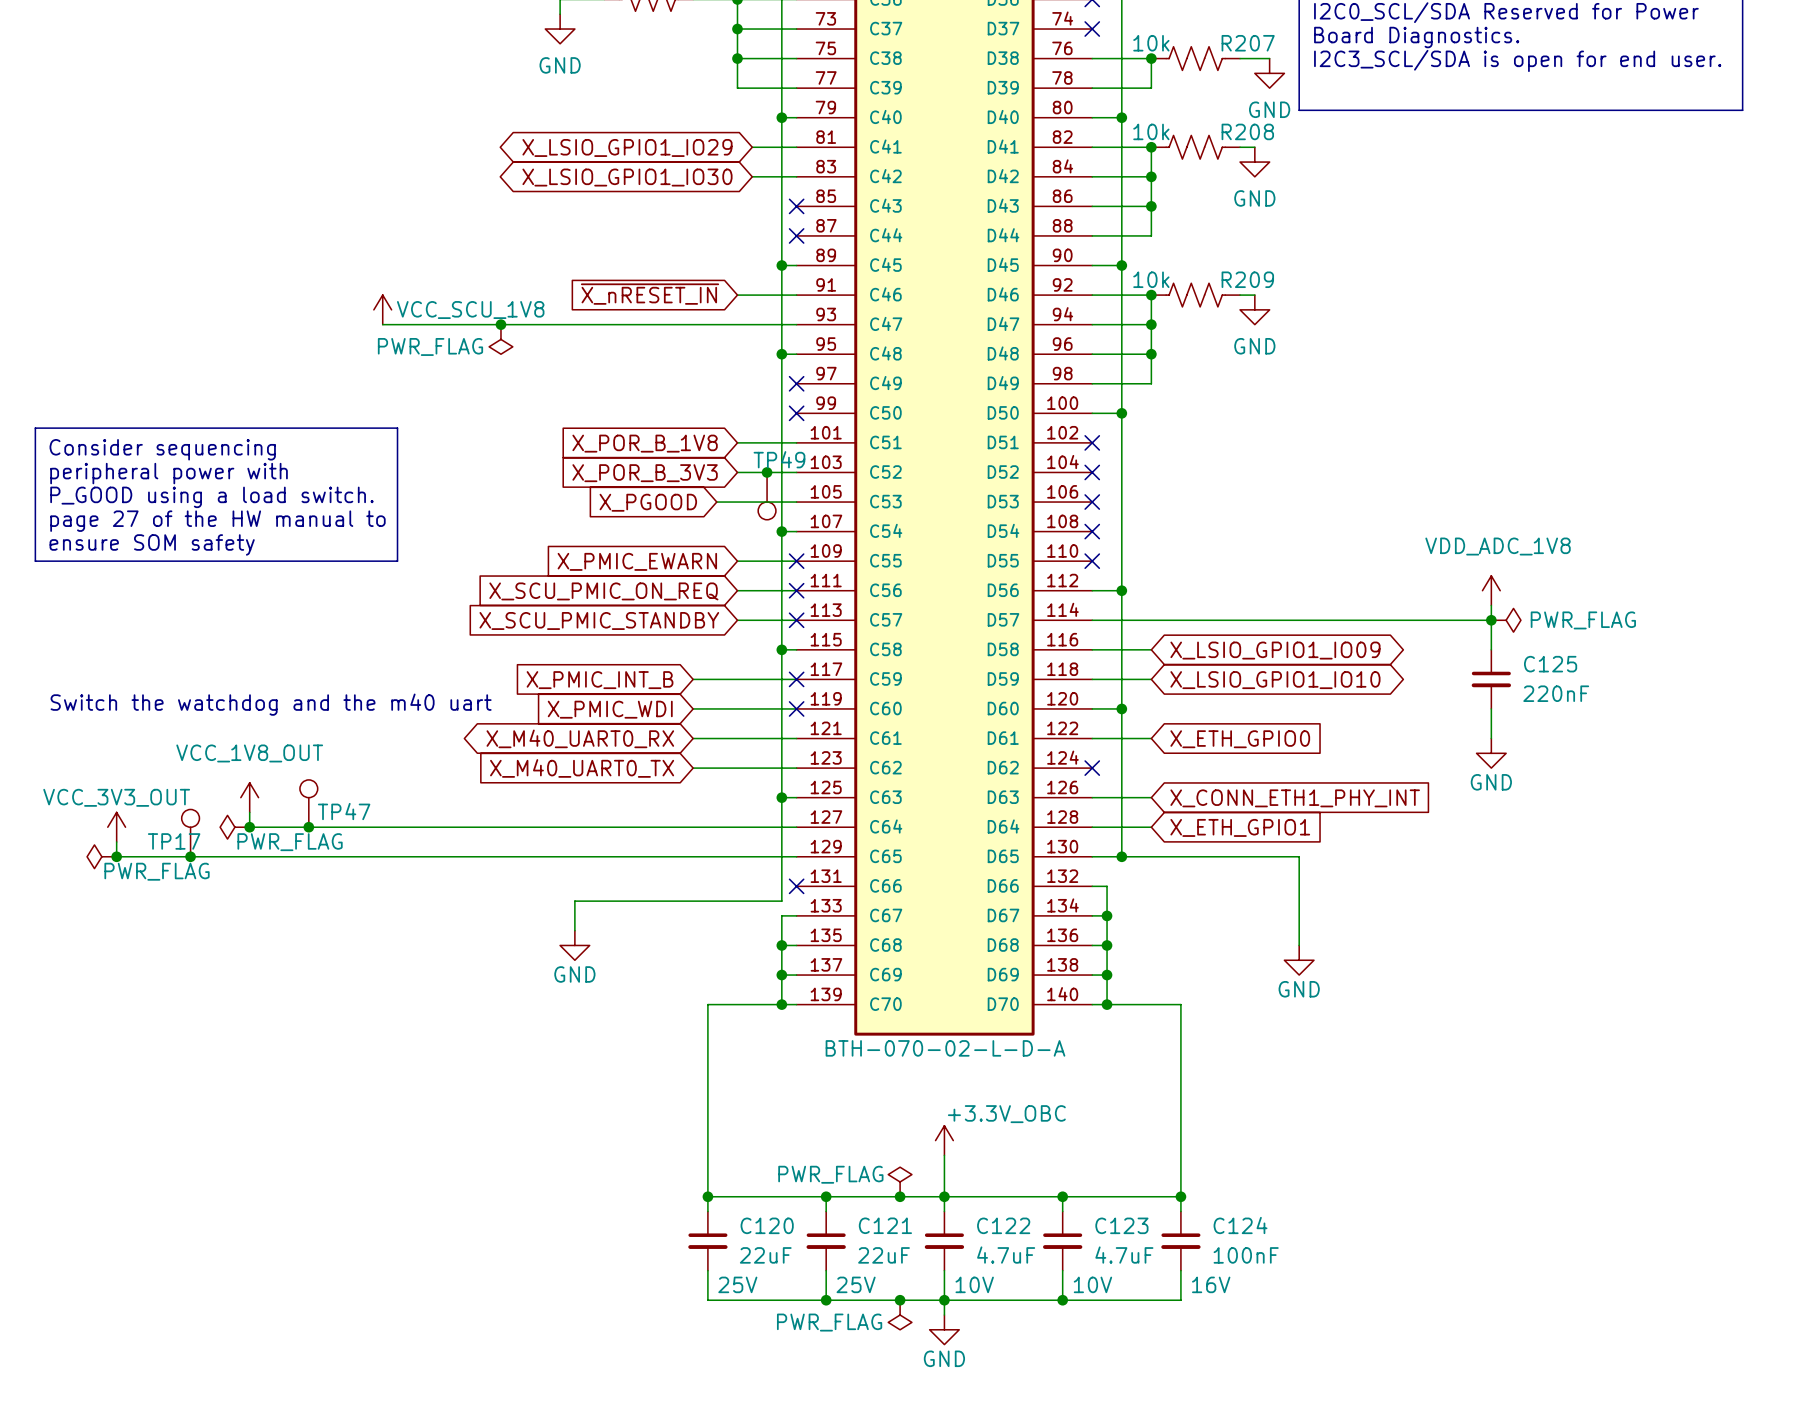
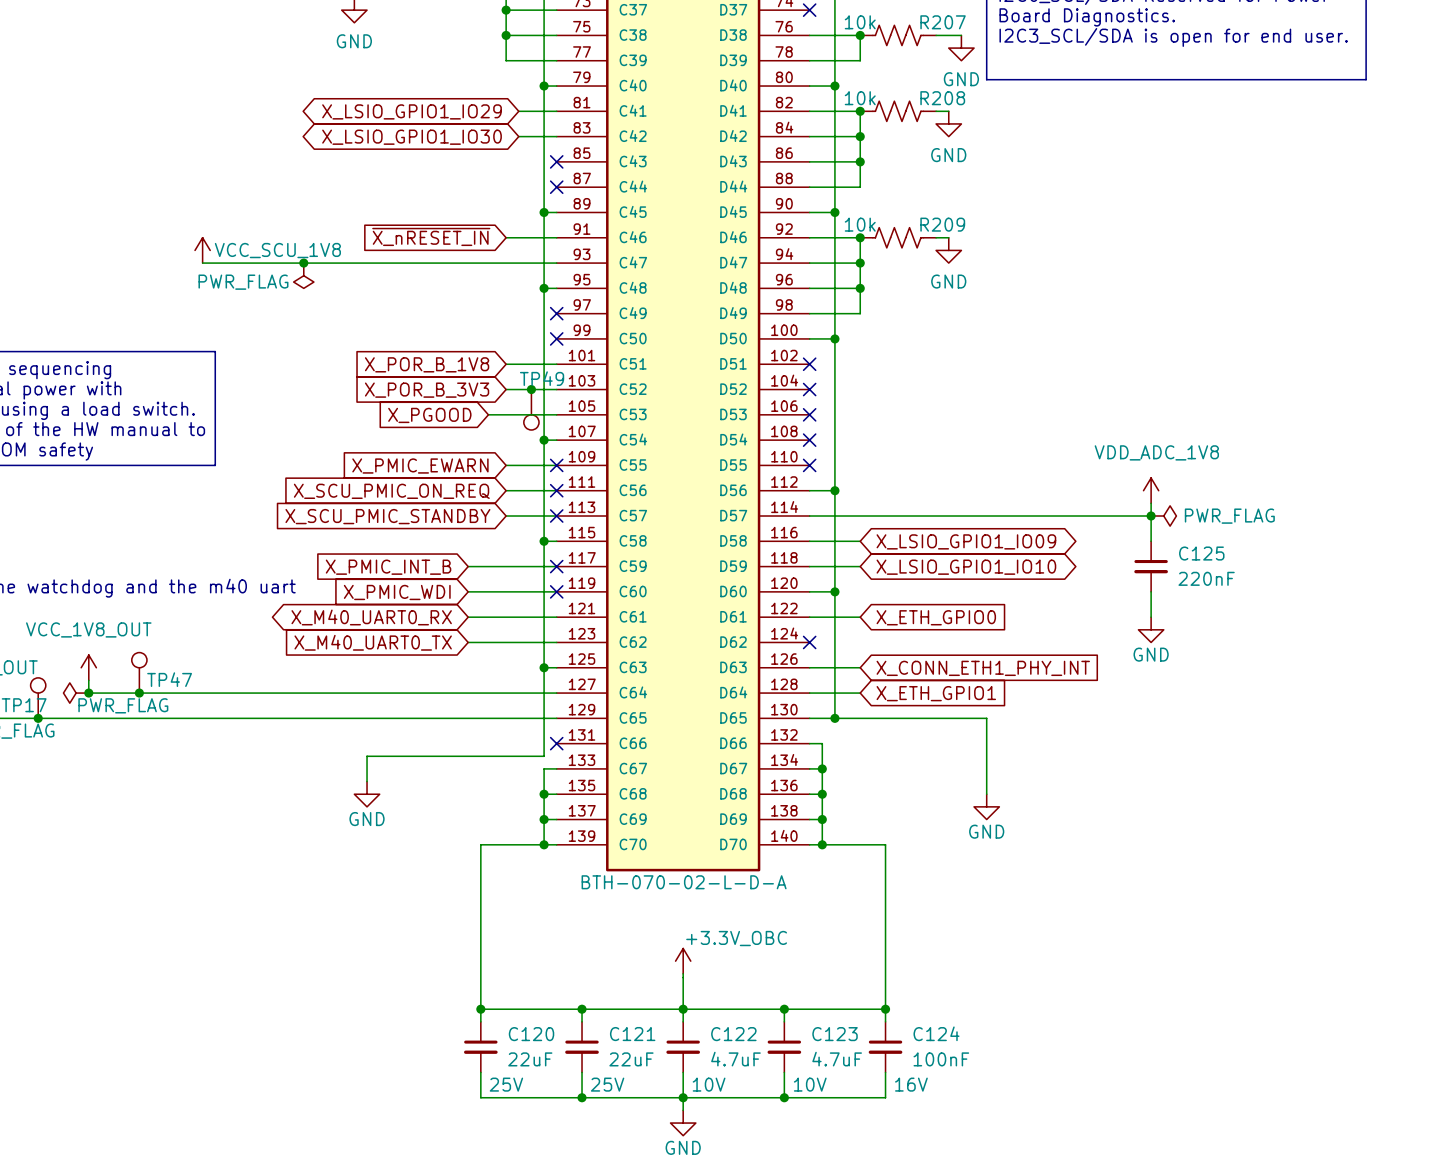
power symbol: PWR_FLAG (900, 1181) -> none
junction: (900, 1196) -> none
junction: (900, 1300) -> none
power symbol: PWR_FLAG (900, 1315) -> none

